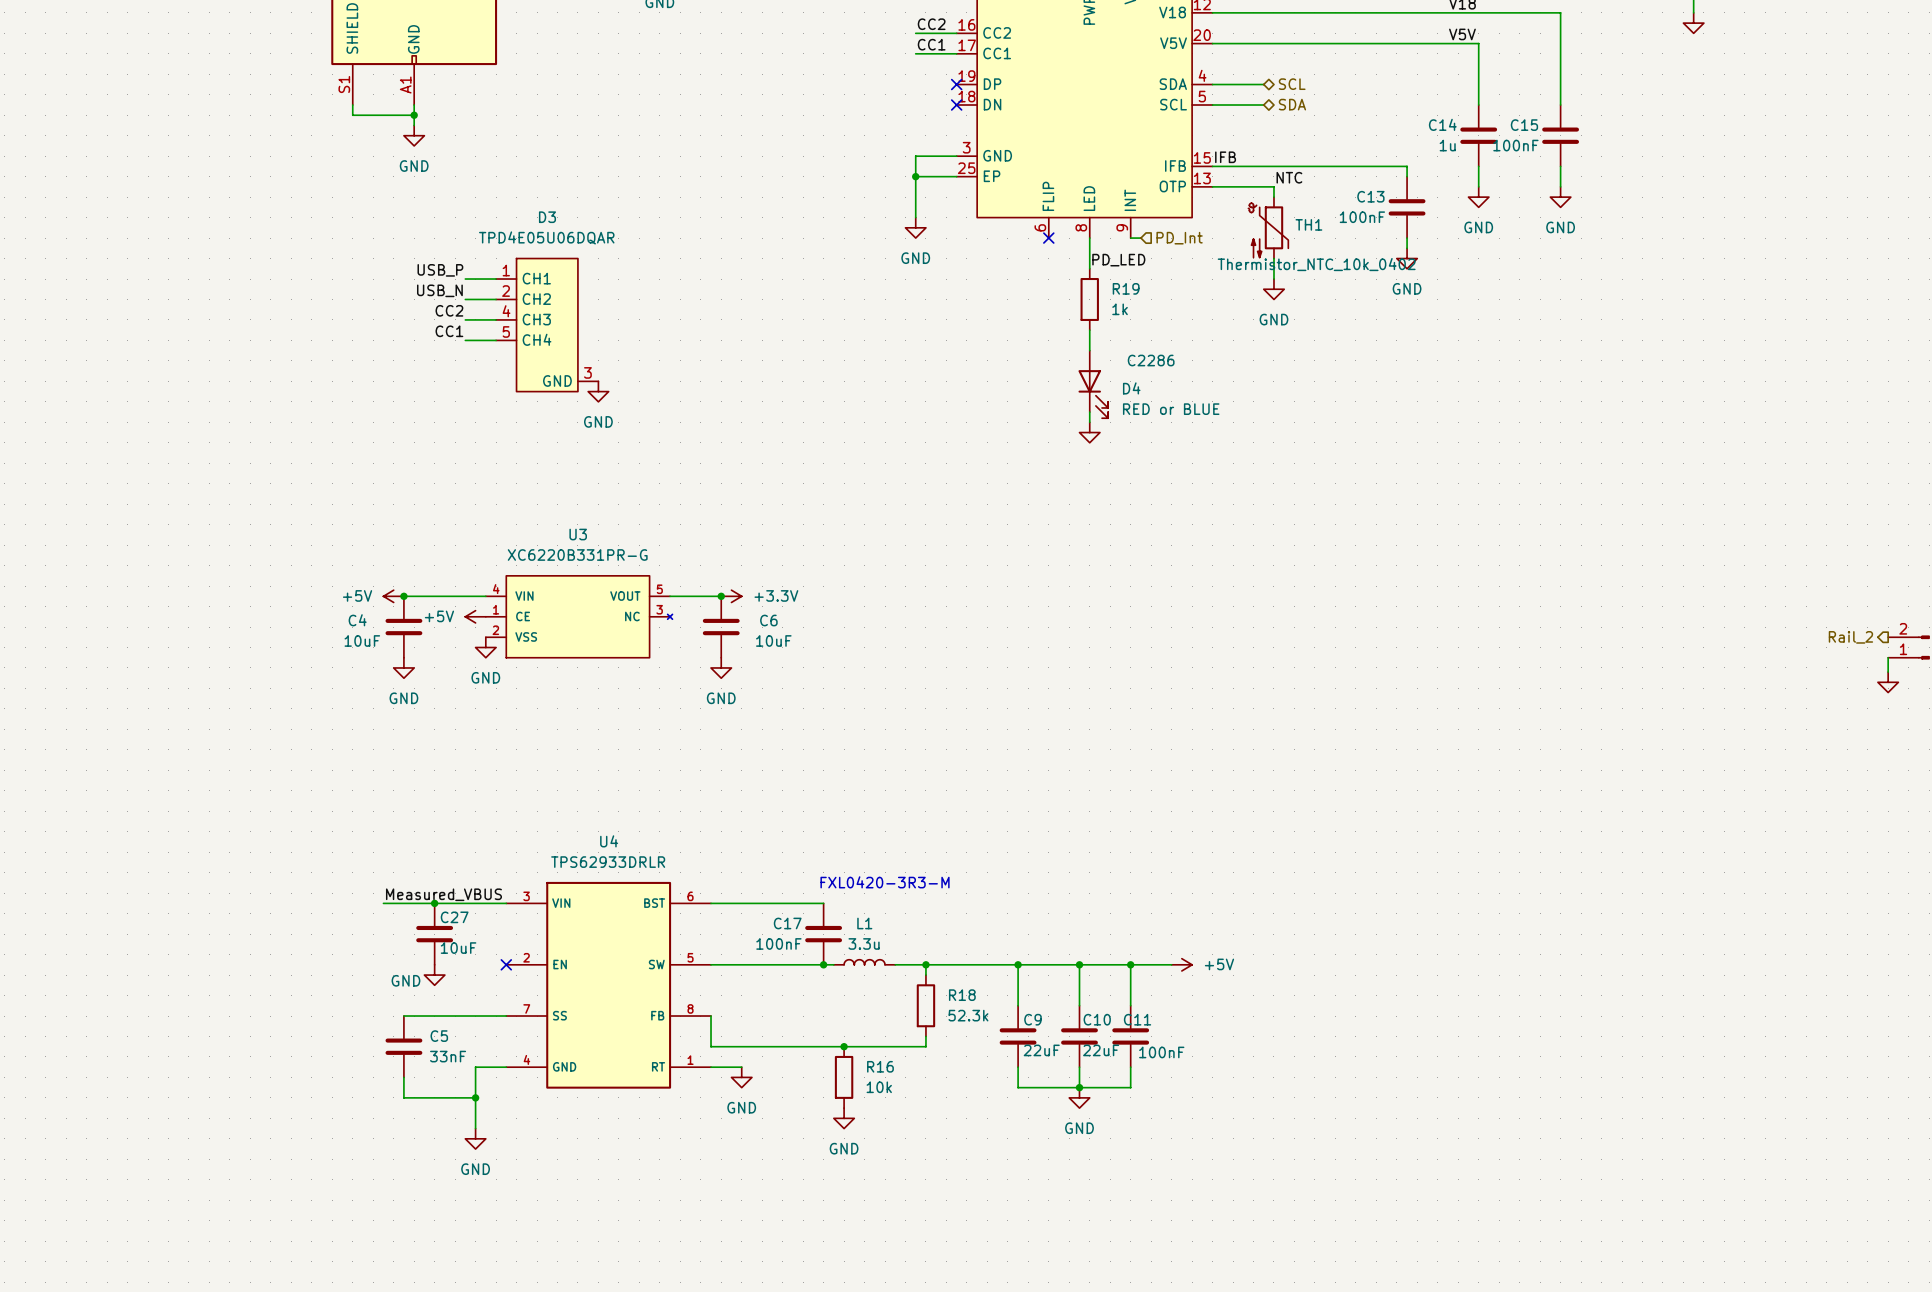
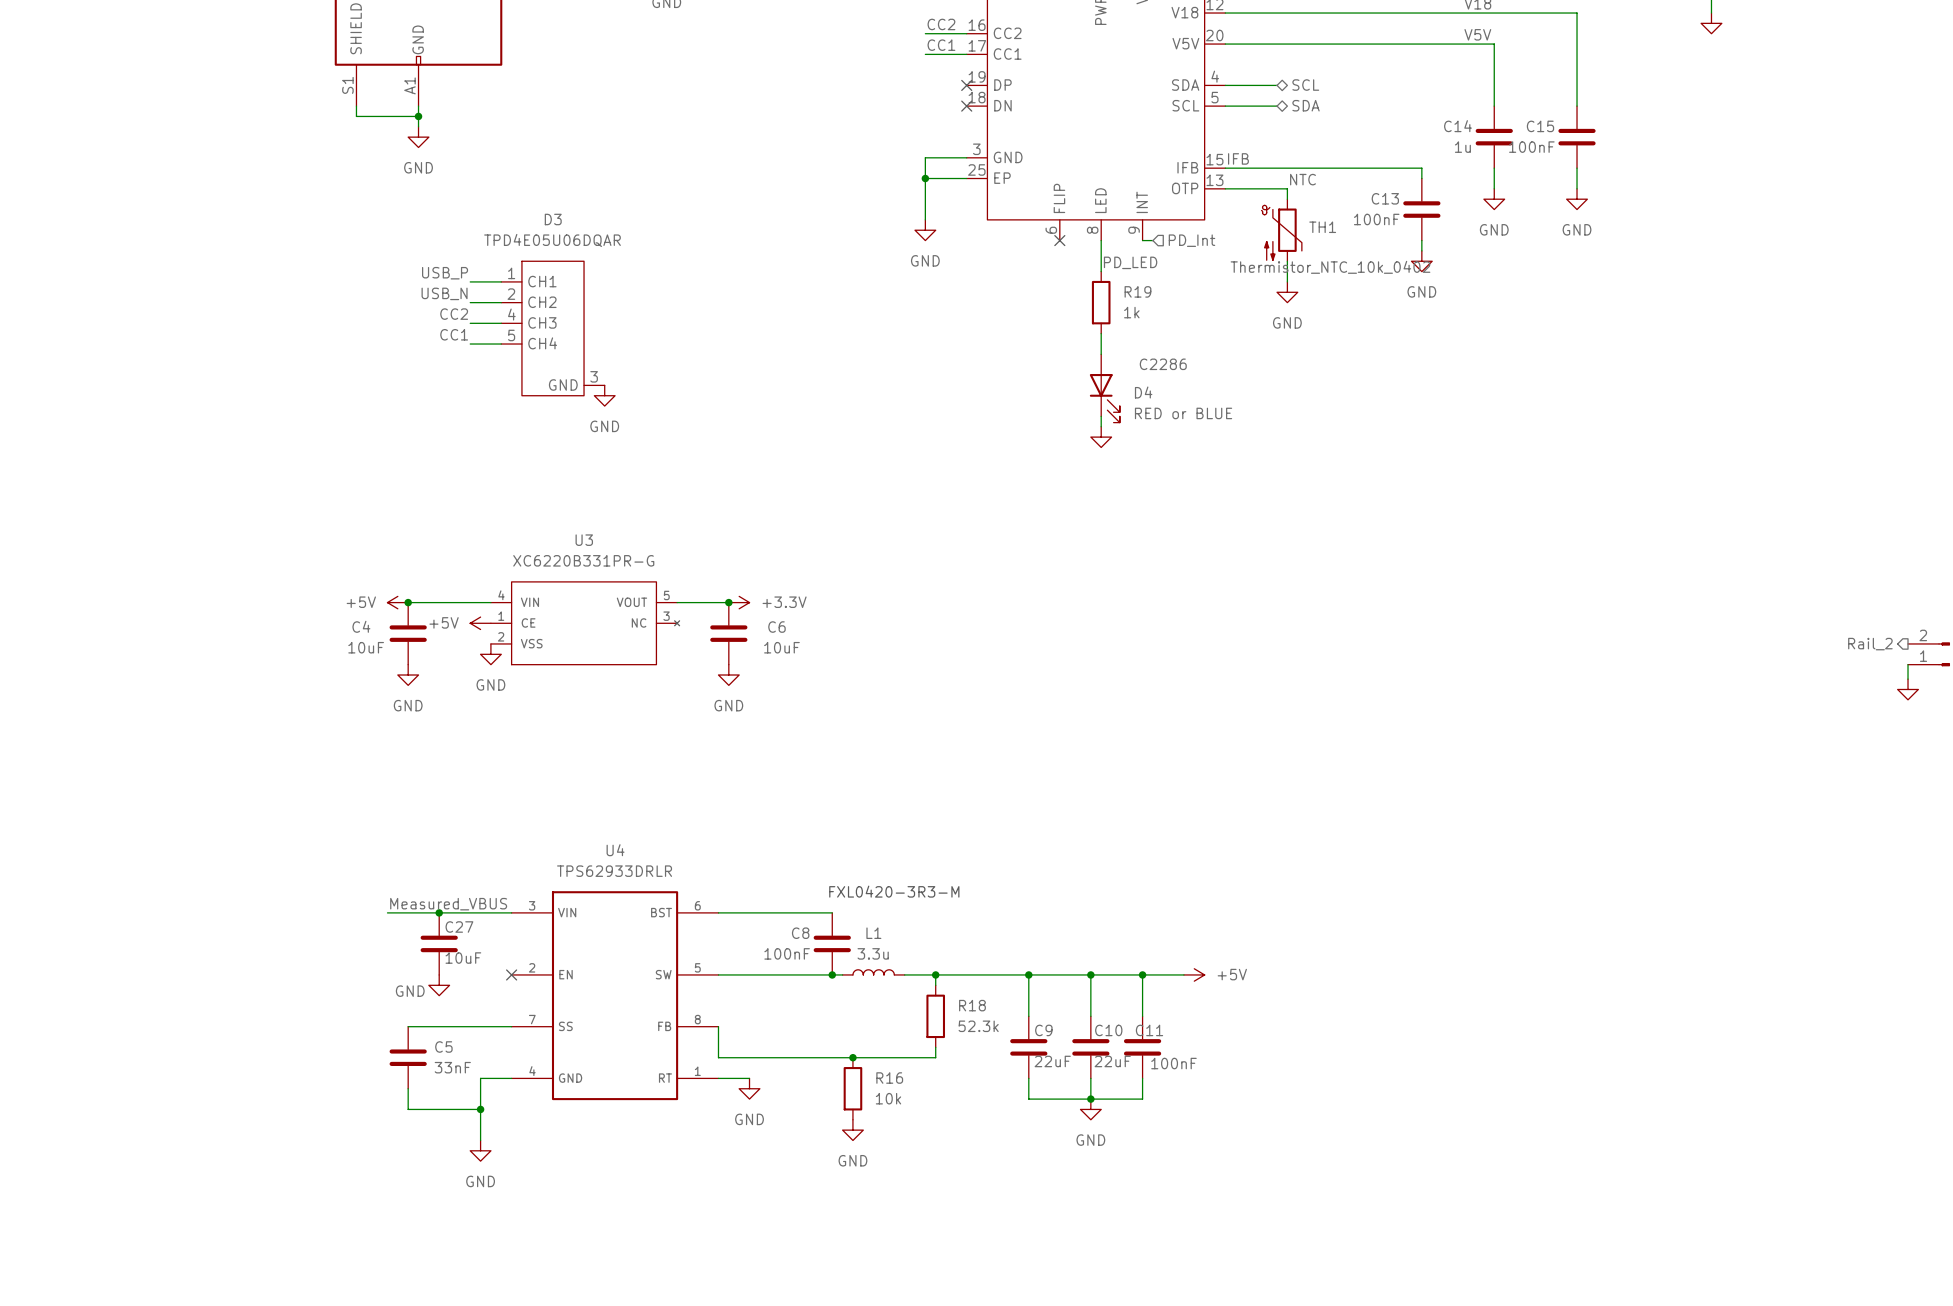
C17 name: C17 (787, 923) -> C8 (800, 933)

